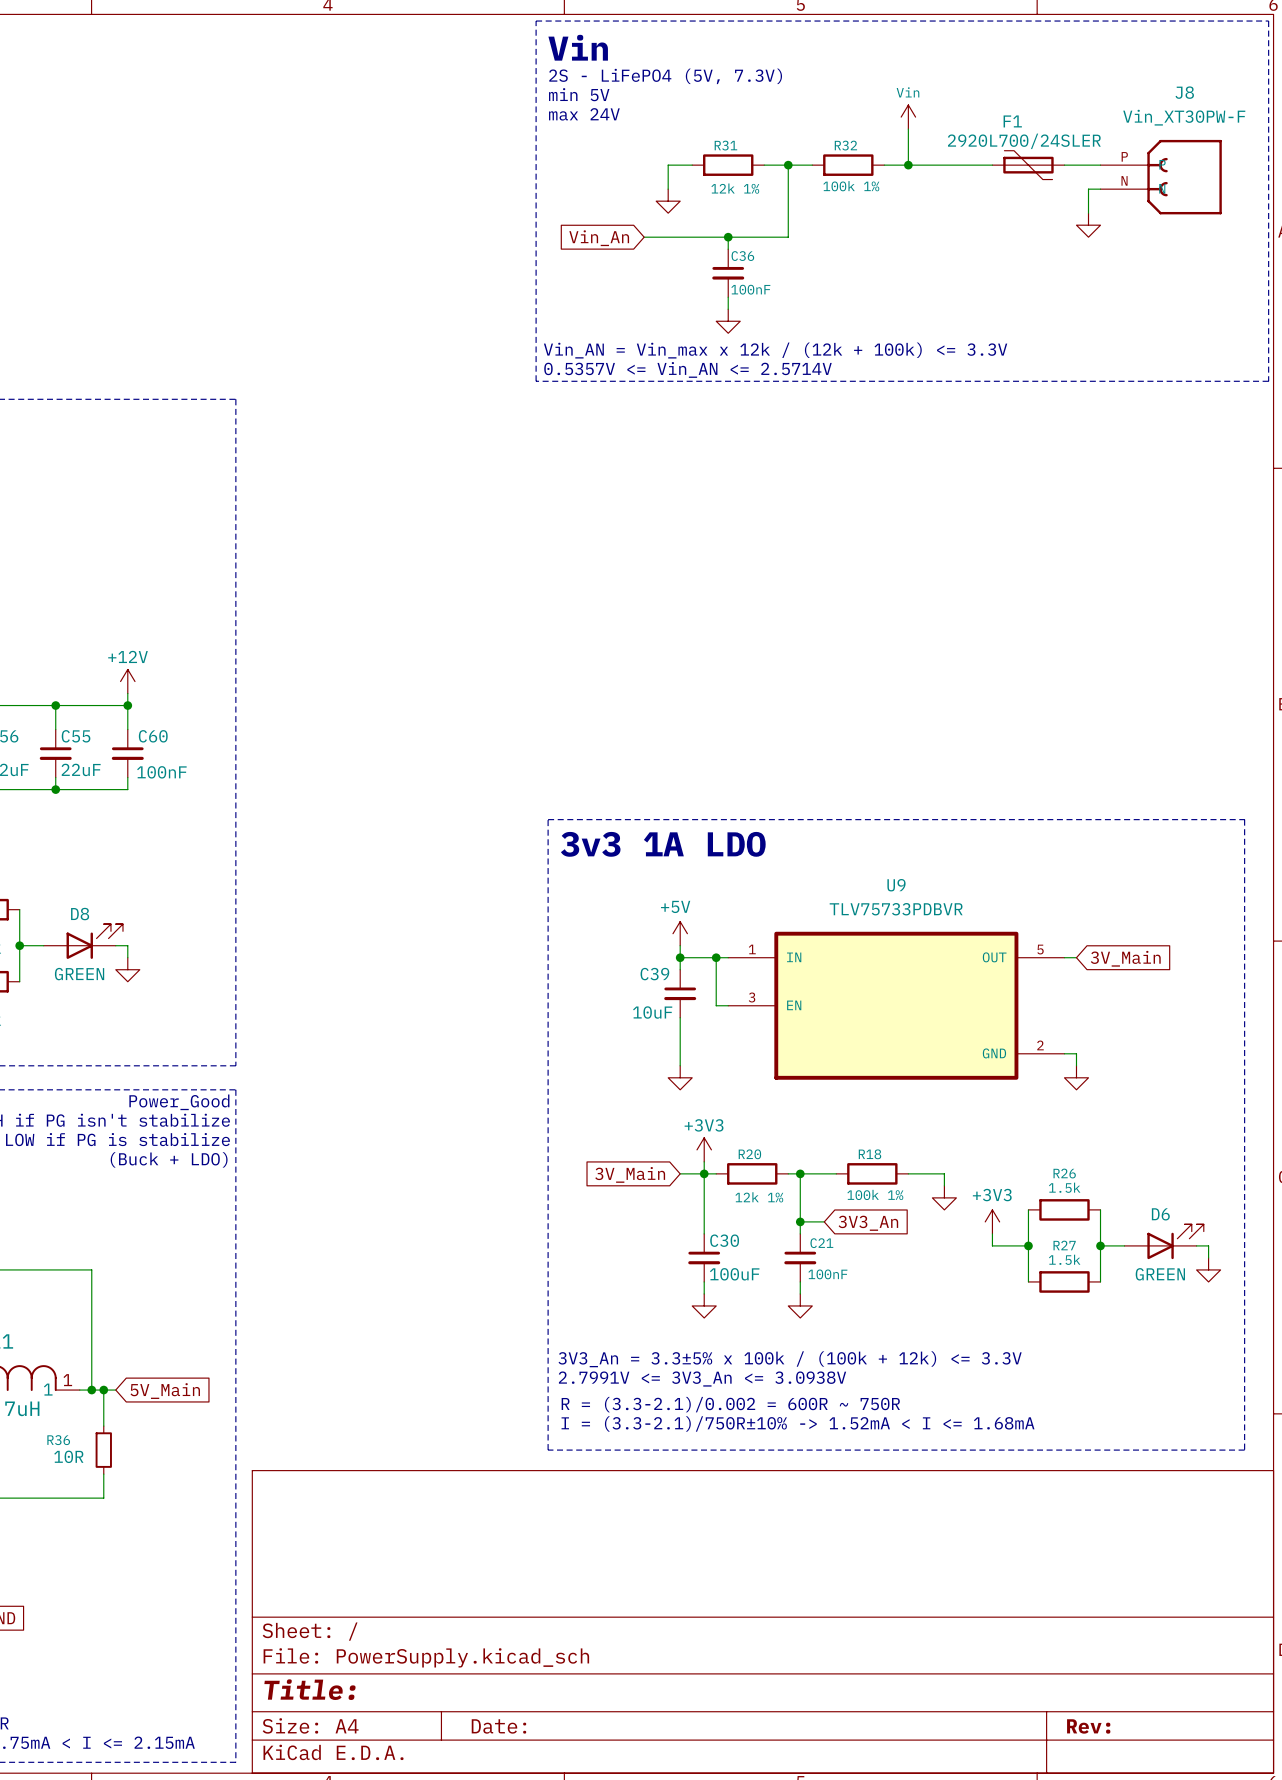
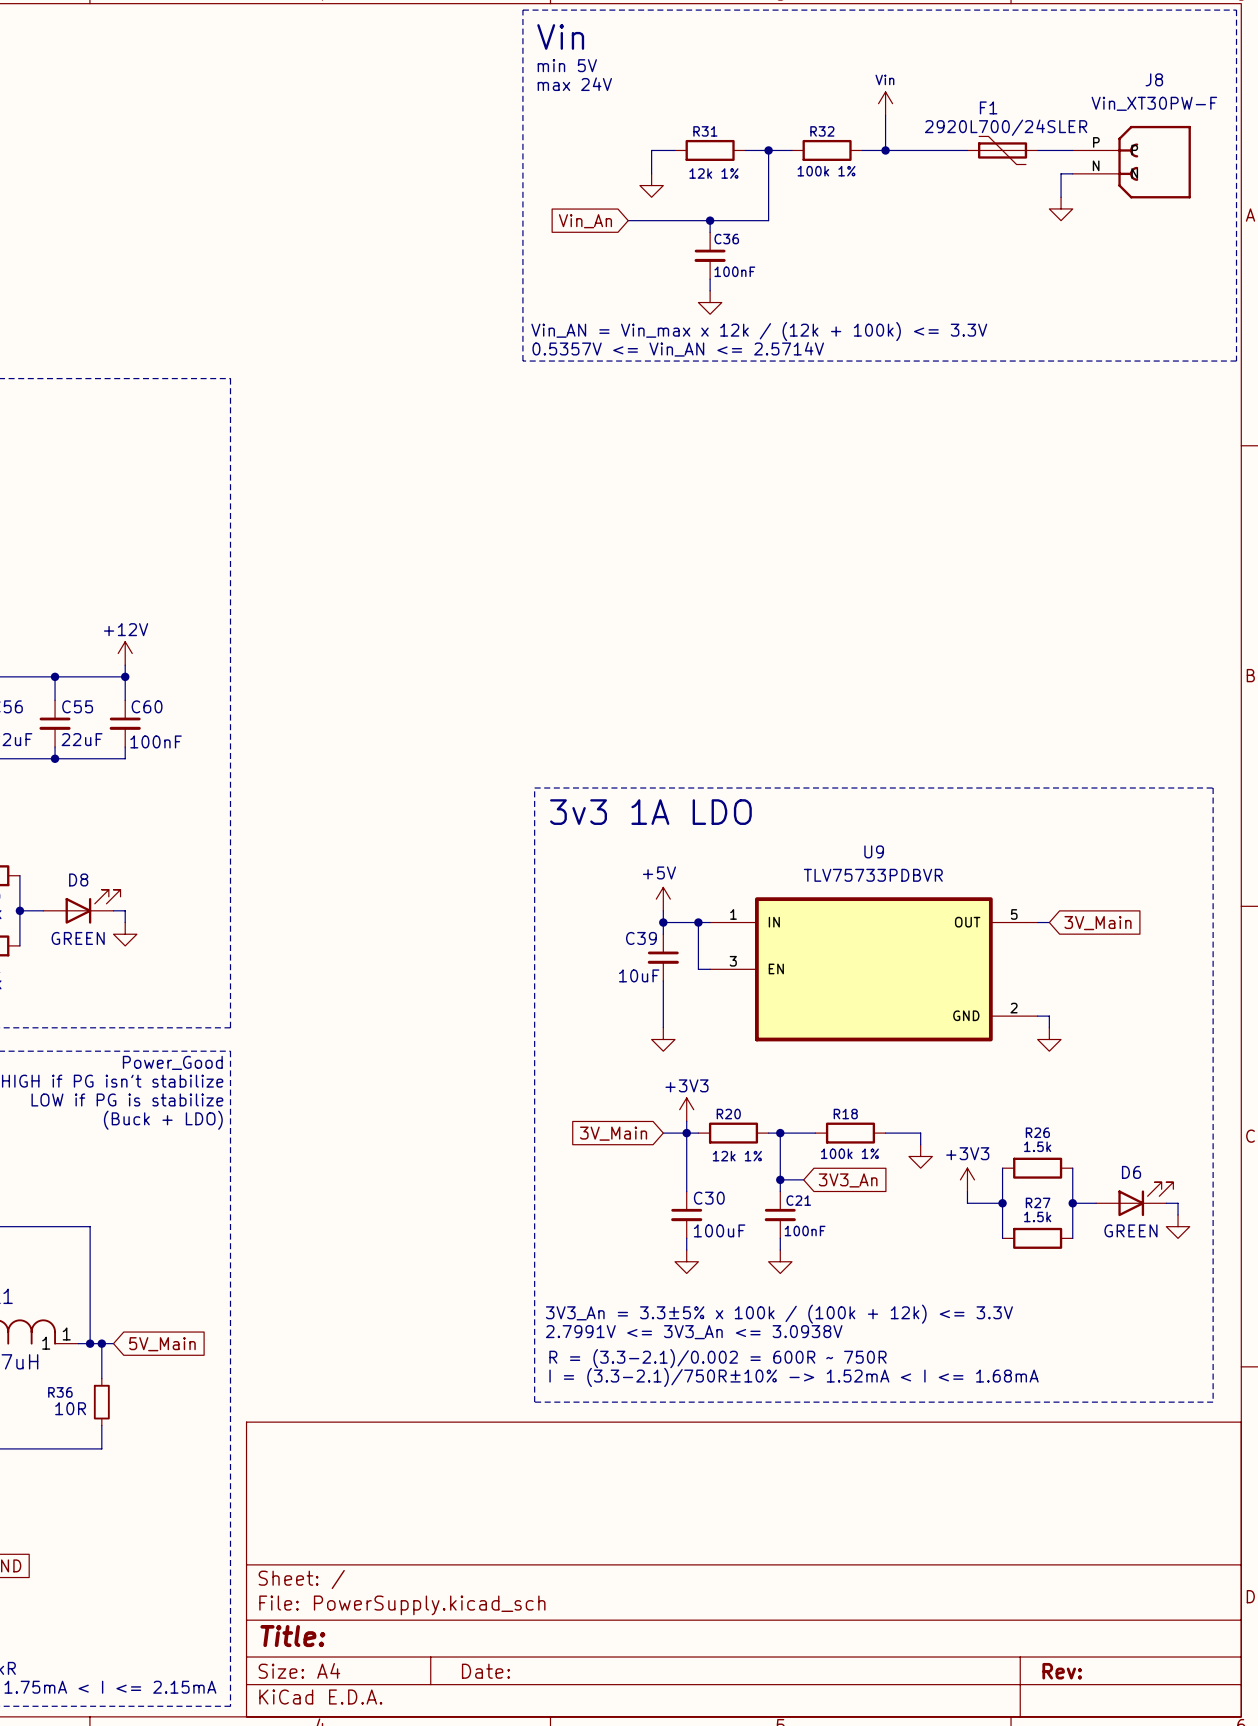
text: 2S - LiFePO4 (5V, 7.3V) (665, 76) -> min 5V (567, 65)
text: min 5V (579, 94) -> max 24V (574, 84)
text: max 24V (584, 114) -> none

